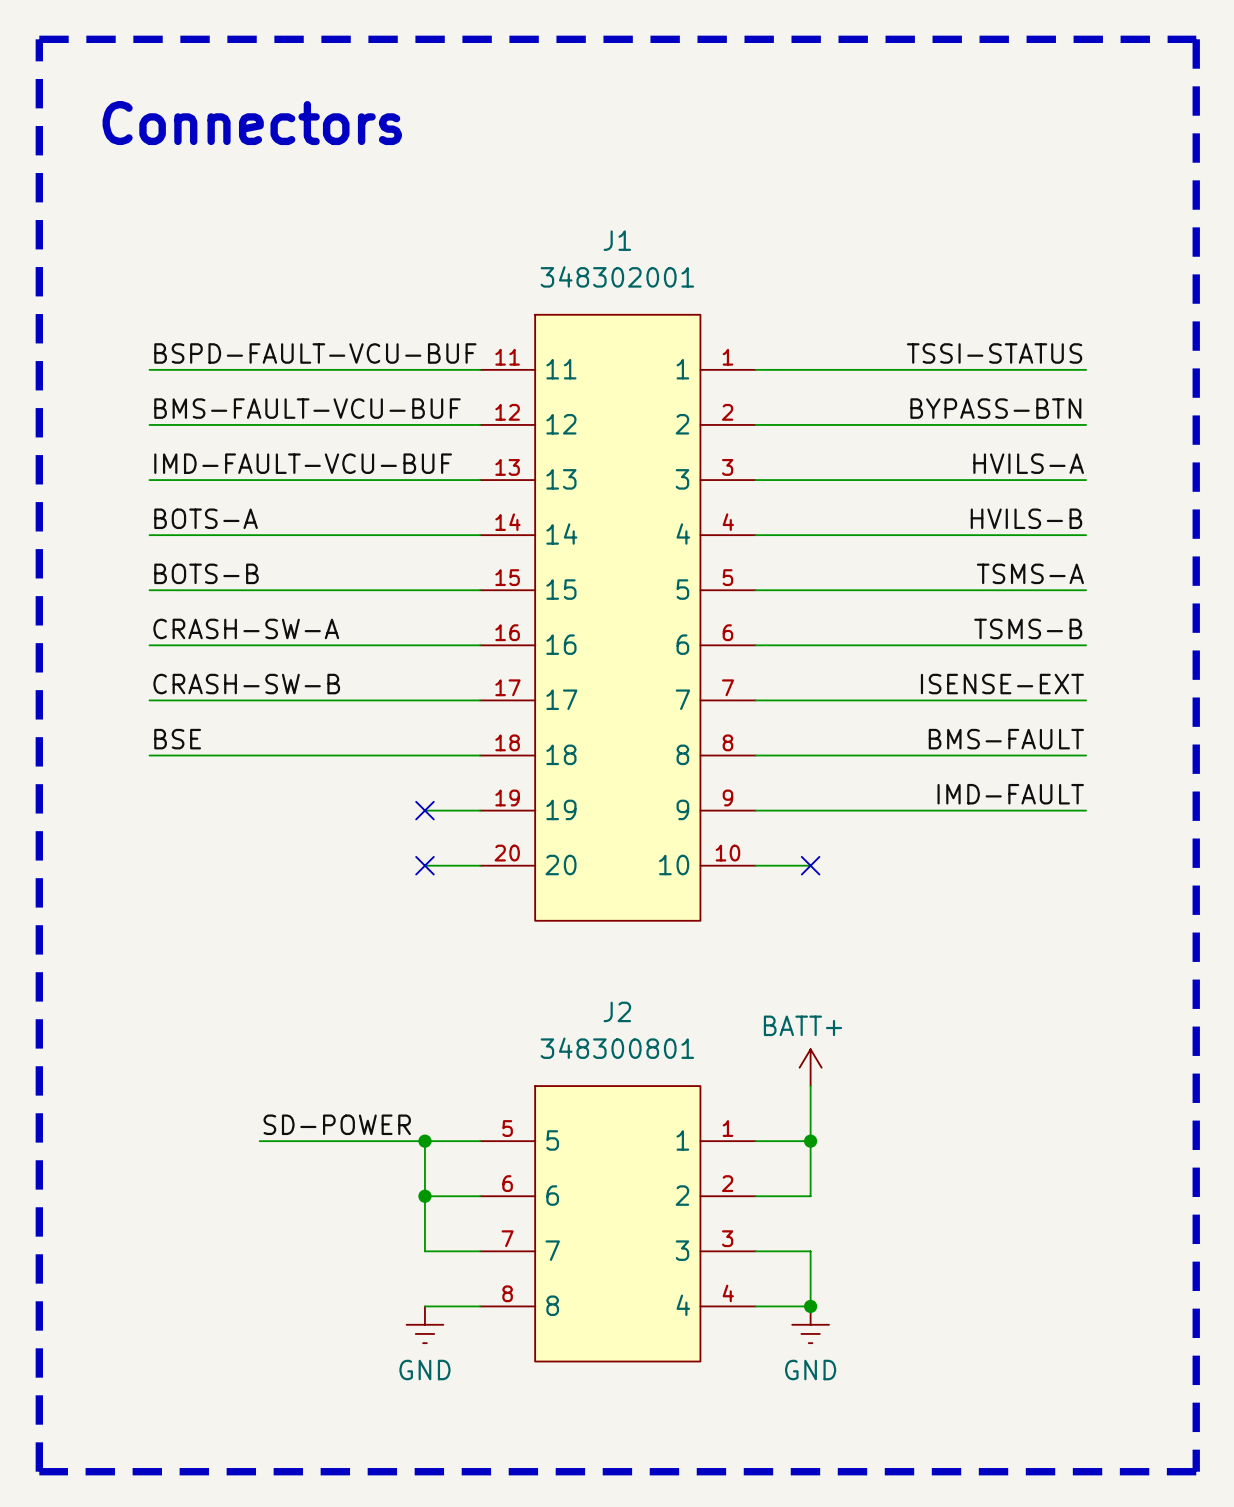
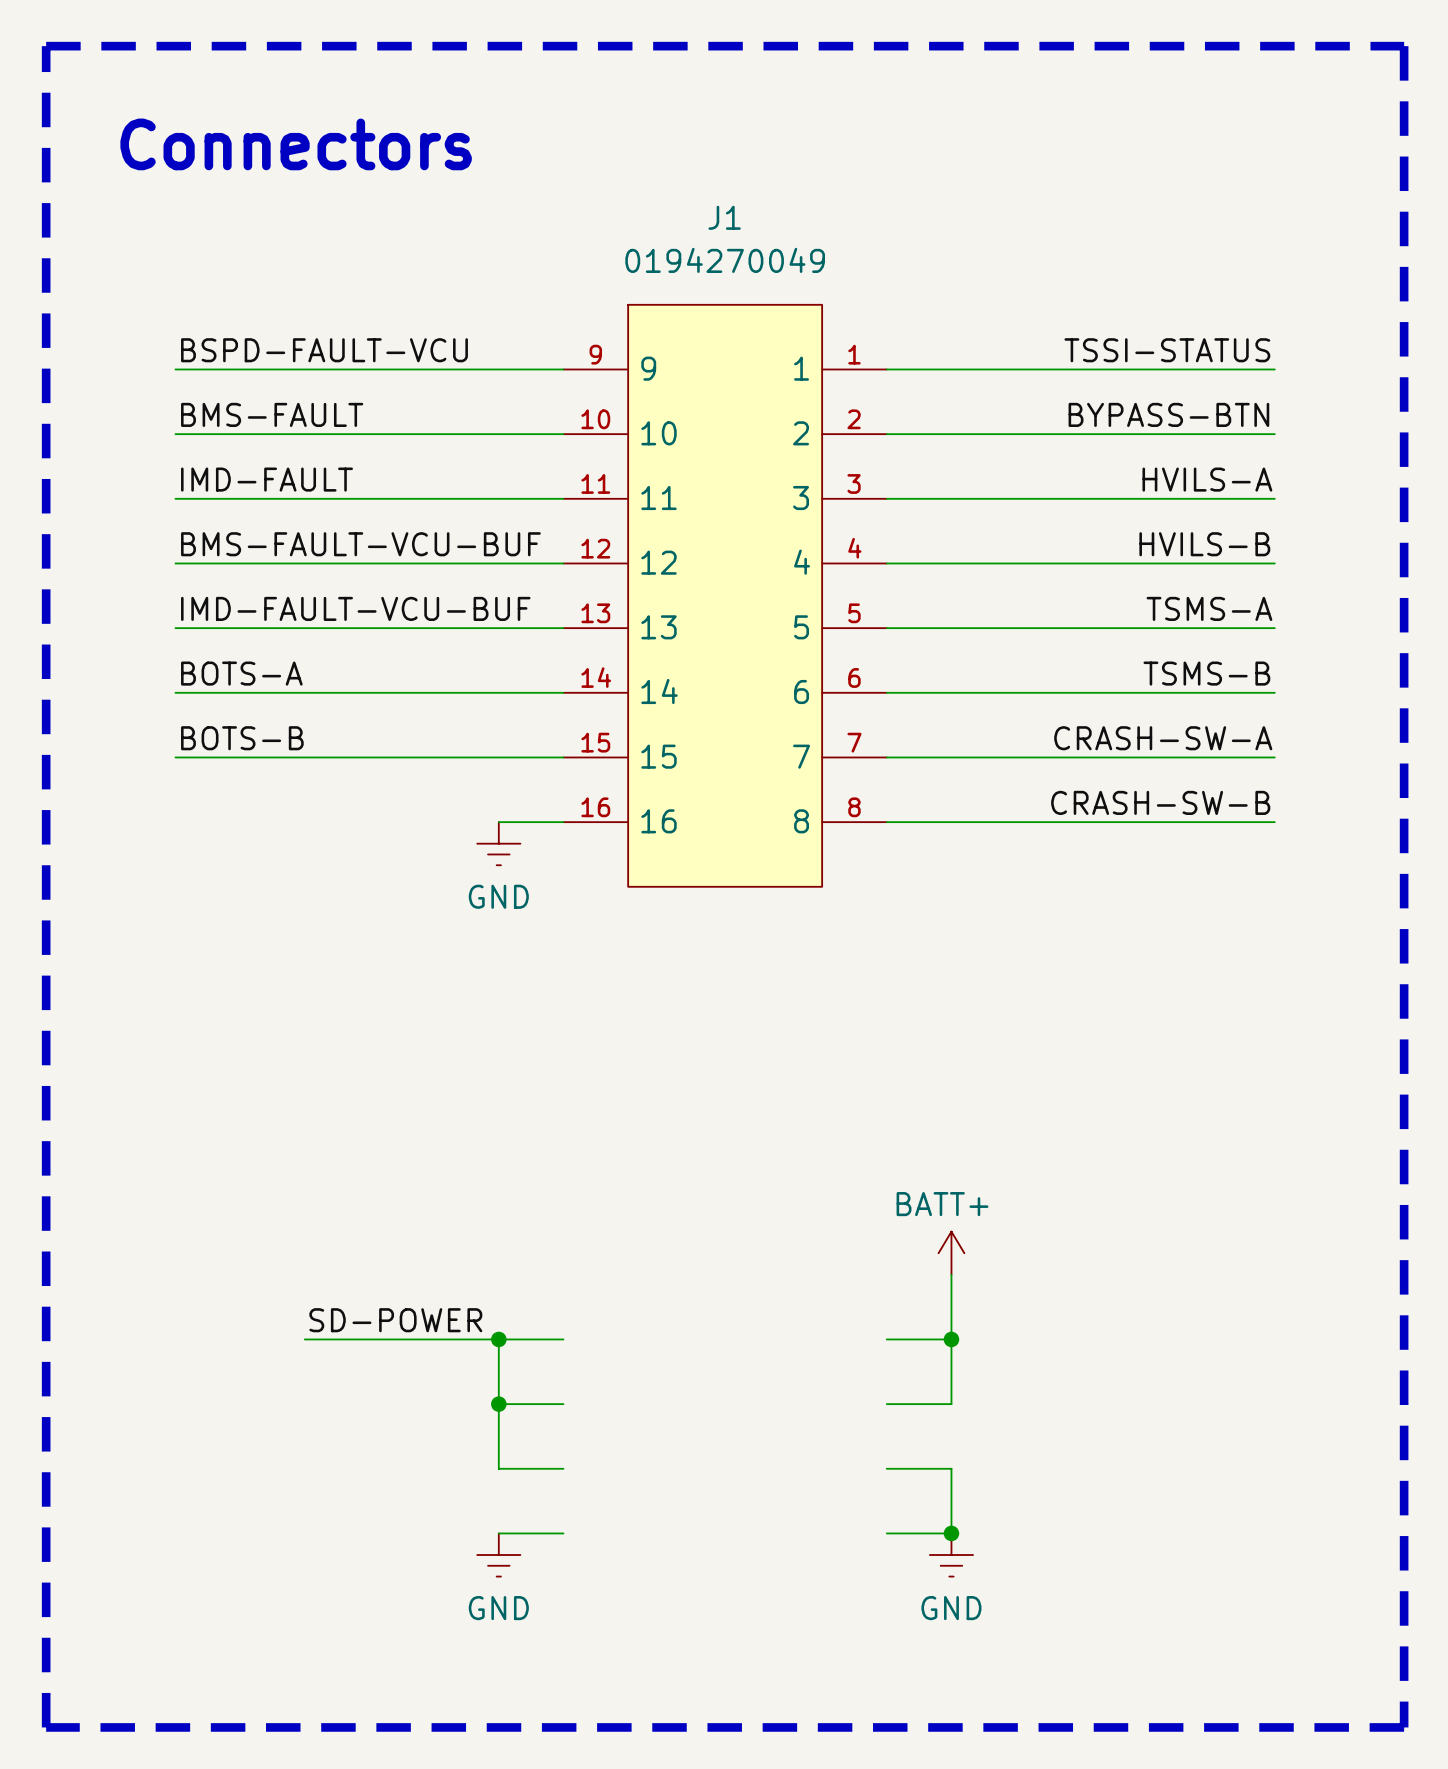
J1 name position: J1 (617, 240) -> J1 (724, 217)
J1 value: 348302001 (617, 276) -> 0194270049 (725, 260)
label: none -> BSPD-FAULT-VCU (324, 350)
label: none -> TSSI-STATUS (1167, 350)
wire: none -> (175, 369) (563, 369)
J1 symbol: [480, 314, 756, 921] -> [563, 304, 887, 887]
wire: none -> (886, 369) (1274, 369)
label: BSPD-FAULT-VCU-BUF (315, 353) -> BMS-FAULT (272, 414)
label: TSSI-STATUS (994, 353) -> BYPASS-BTN (1168, 414)
label: BMS-FAULT-VCU-BUF (307, 408) -> IMD-FAULT (267, 479)
label: BYPASS-BTN (995, 408) -> HVILS-A (1207, 479)
label: IMD-FAULT-VCU-BUF (303, 463) -> BMS-FAULT-VCU-BUF (360, 544)
label: HVILS-A (1028, 463) -> HVILS-B (1204, 544)
label: BOTS-A (206, 518) -> IMD-FAULT-VCU-BUF (355, 608)
label: HVILS-B (1026, 518) -> TSMS-A (1209, 608)
label: BOTS-B (206, 573) -> BOTS-A (241, 673)
label: TSMS-A (1030, 573) -> TSMS-B (1206, 673)
label: CRASH-SW-A (246, 628) -> BOTS-B (242, 738)
label: TSMS-B (1028, 628) -> CRASH-SW-A (1163, 738)
label: CRASH-SW-B (246, 684) -> none
label: ISENSE-EXT (1002, 684) -> CRASH-SW-B (1160, 802)
wire: (149, 700) (424, 700) -> none
power symbol: none -> GND (498, 843)
label: BSE (177, 739) -> none
label: BMS-FAULT (1006, 739) -> none
wire: (149, 755) (480, 755) -> none
wire: (755, 755) (1086, 755) -> none
label: IMD-FAULT (1010, 794) -> none
wire: (424, 810) (480, 810) -> none
no-connect mark: (424, 810) -> none
wire: (755, 810) (1086, 810) -> none
wire: (424, 865) (480, 865) -> none
no-connect mark: (424, 865) -> none
wire: (755, 865) (810, 865) -> none
no-connect mark: (810, 865) -> none
J2: 348300801 (617, 1223) -> none

